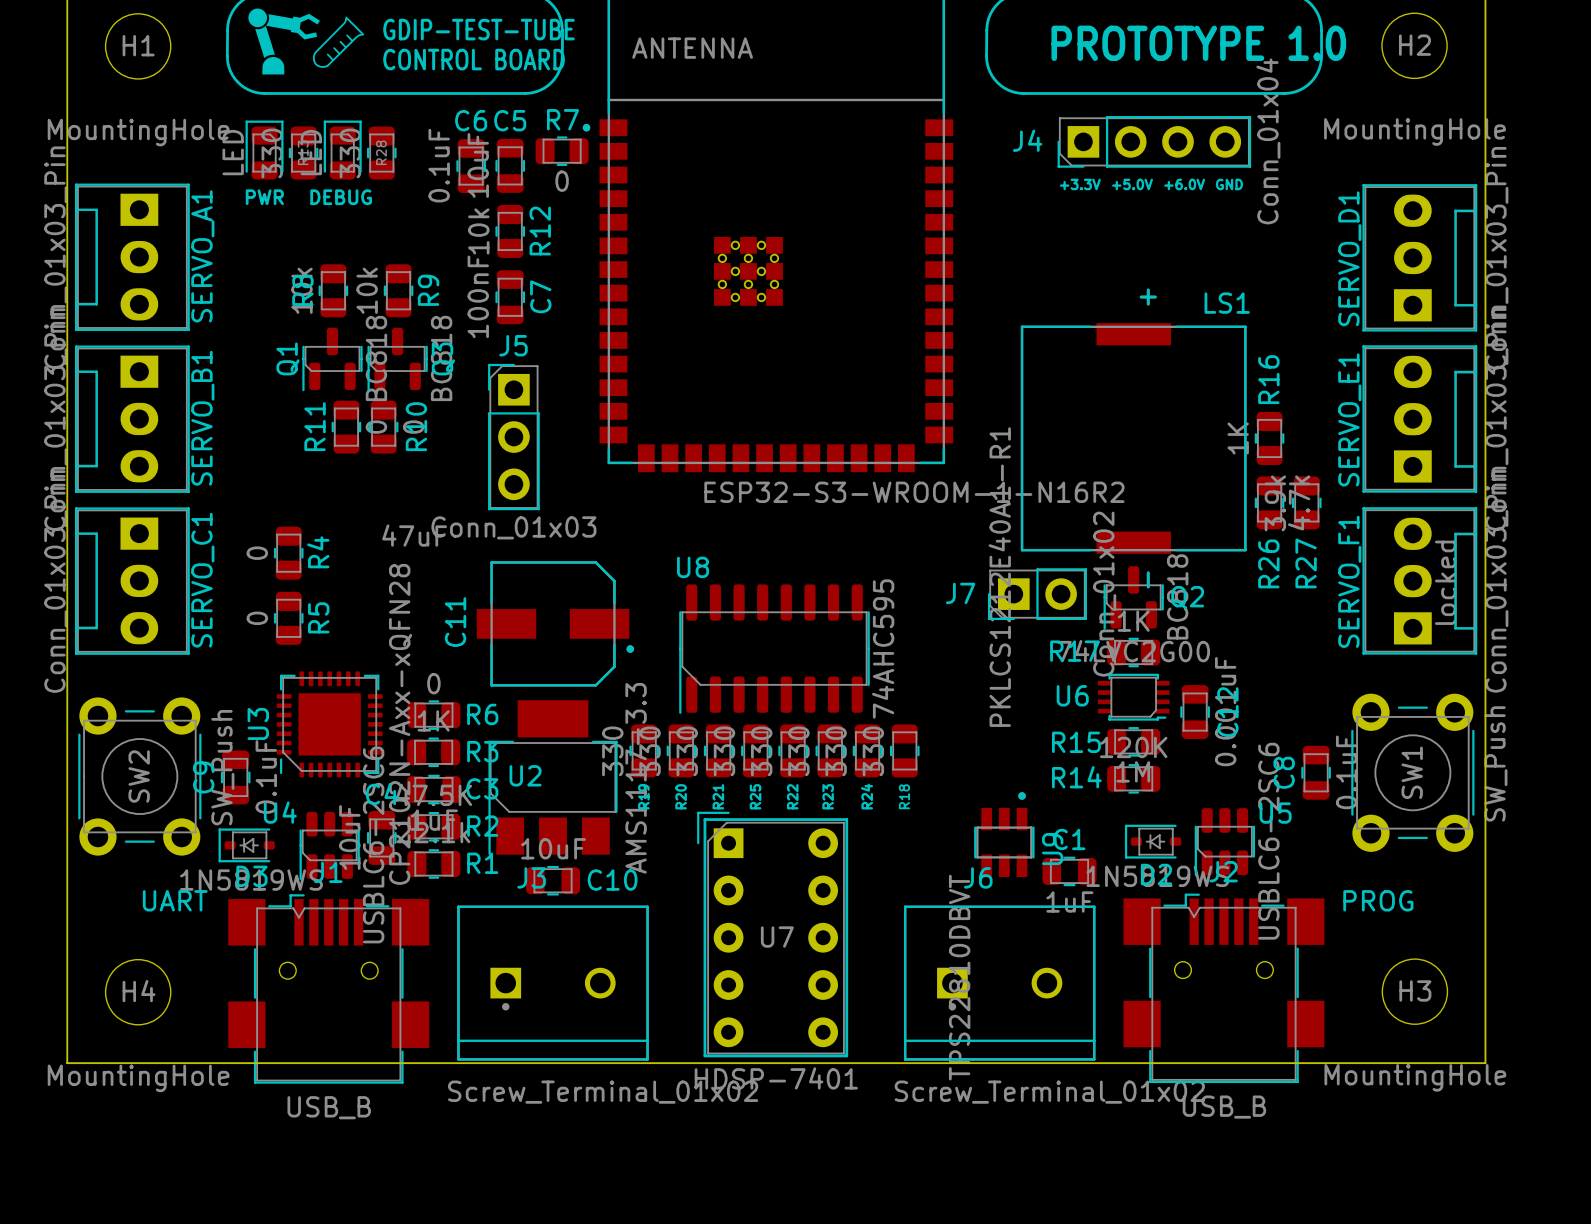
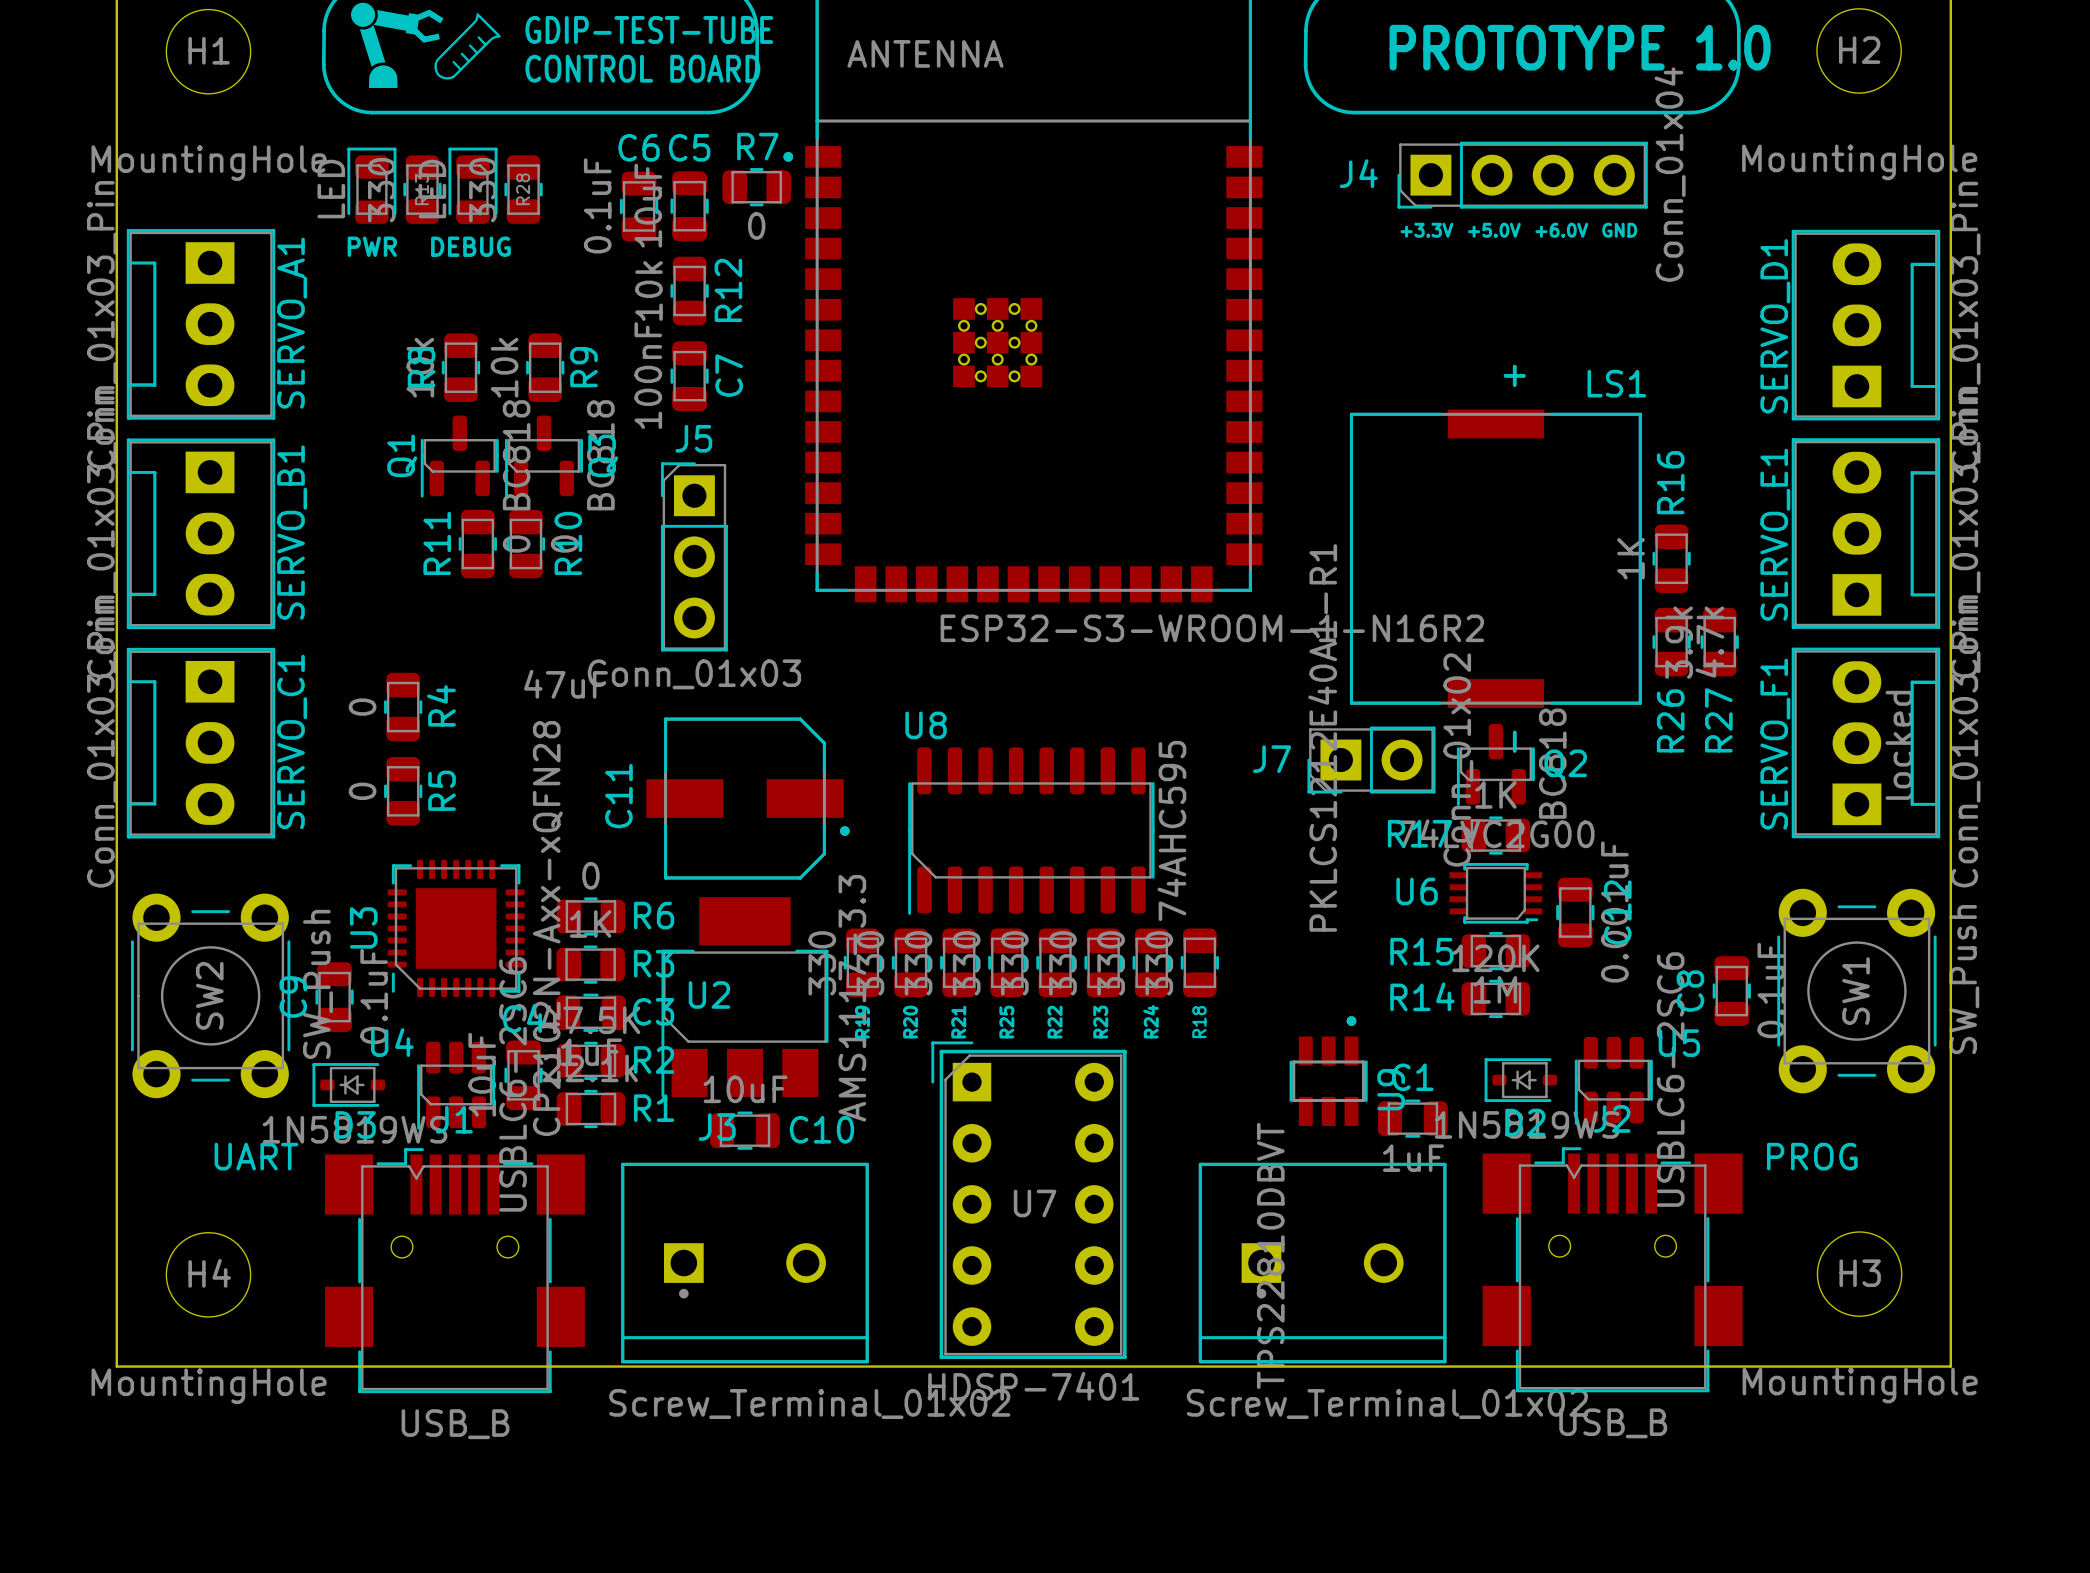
J6 name: J6 (978, 877) -> none

